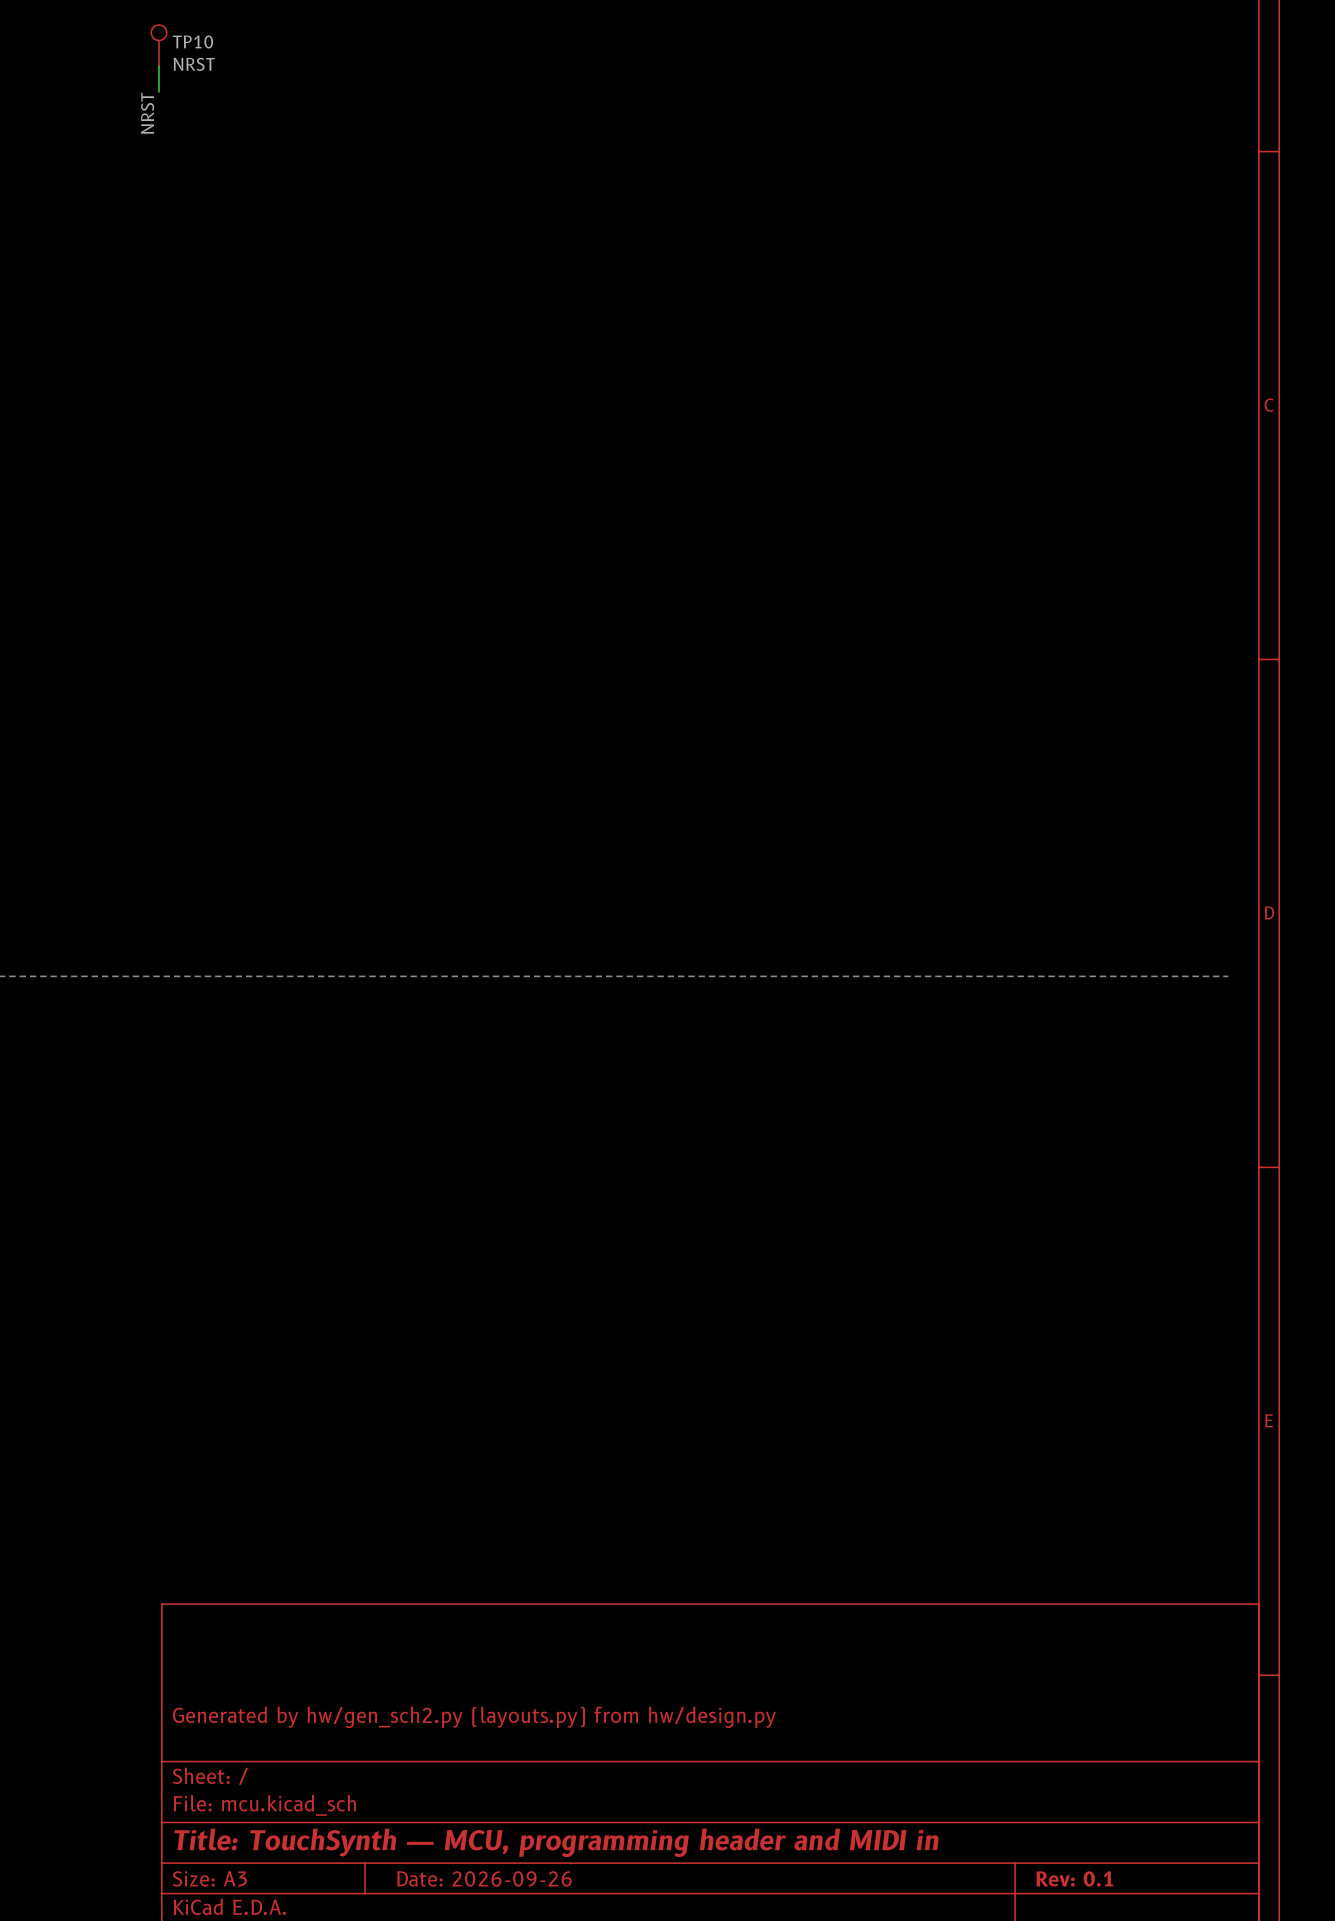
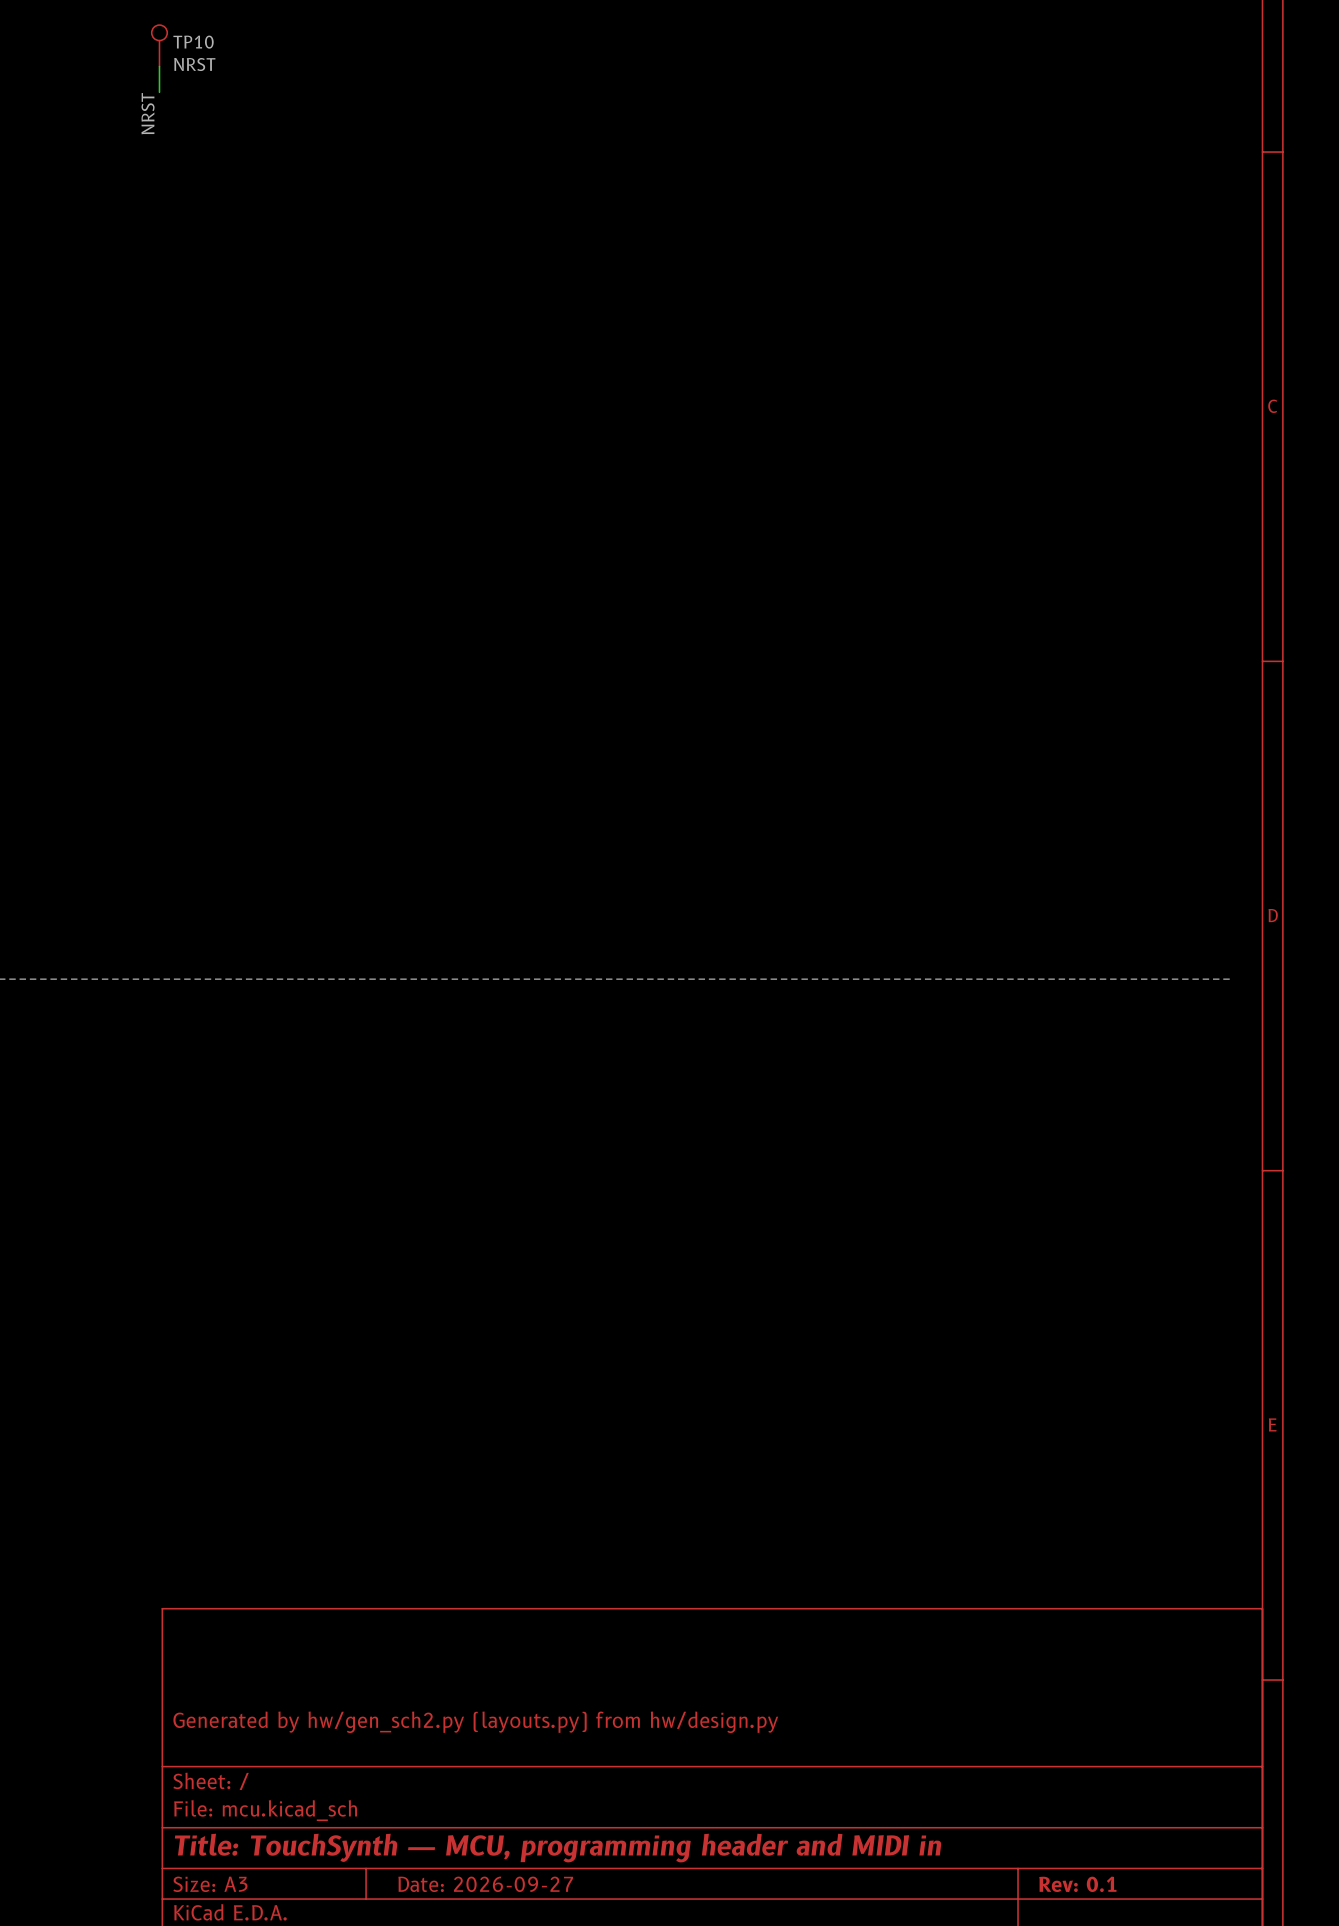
title block: Date: 2026-09-26 (484, 1878) -> Date: 2026-09-27 (485, 1884)

